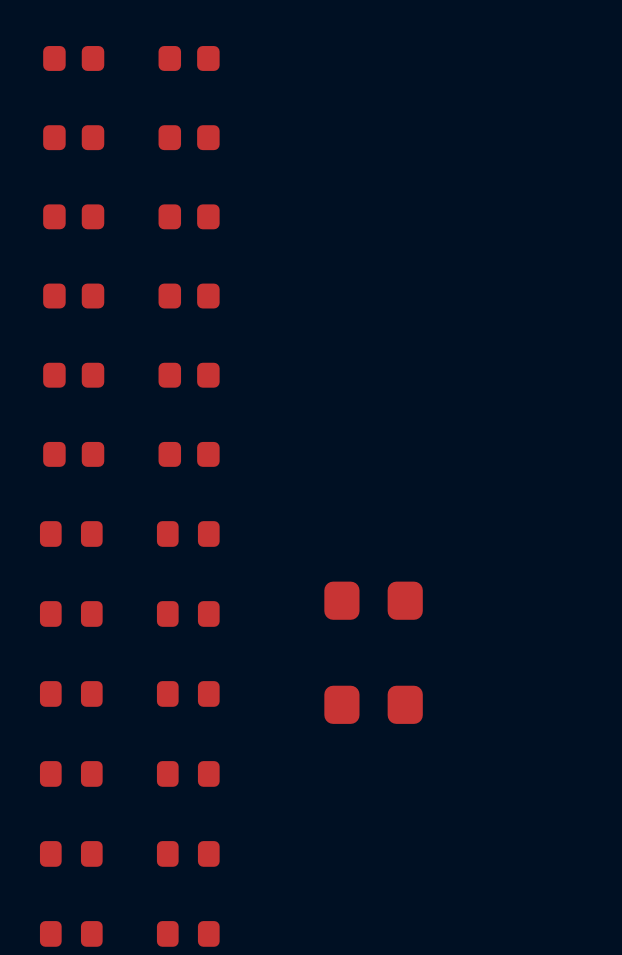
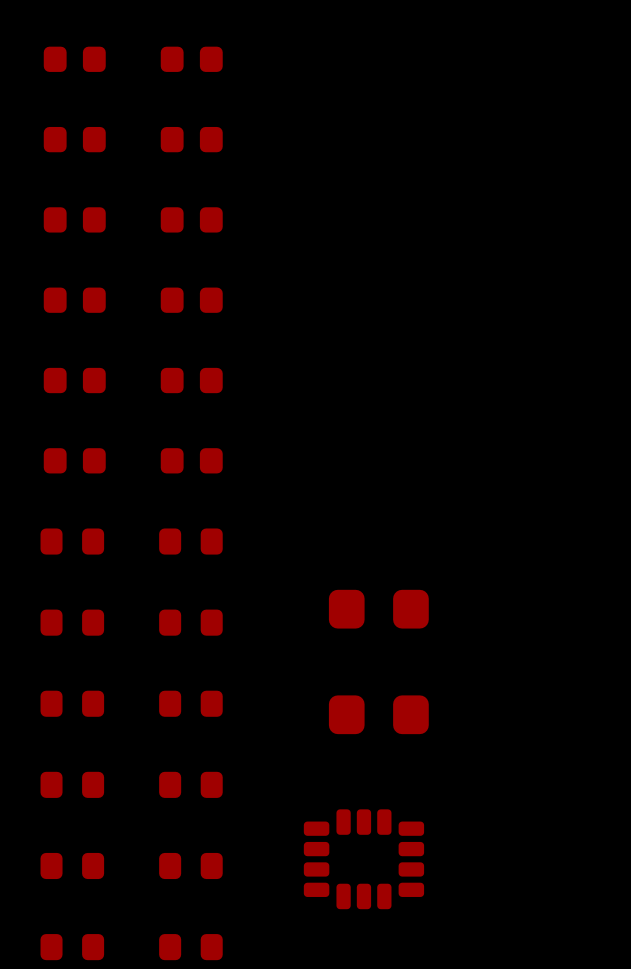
part: none -> (363, 859)

